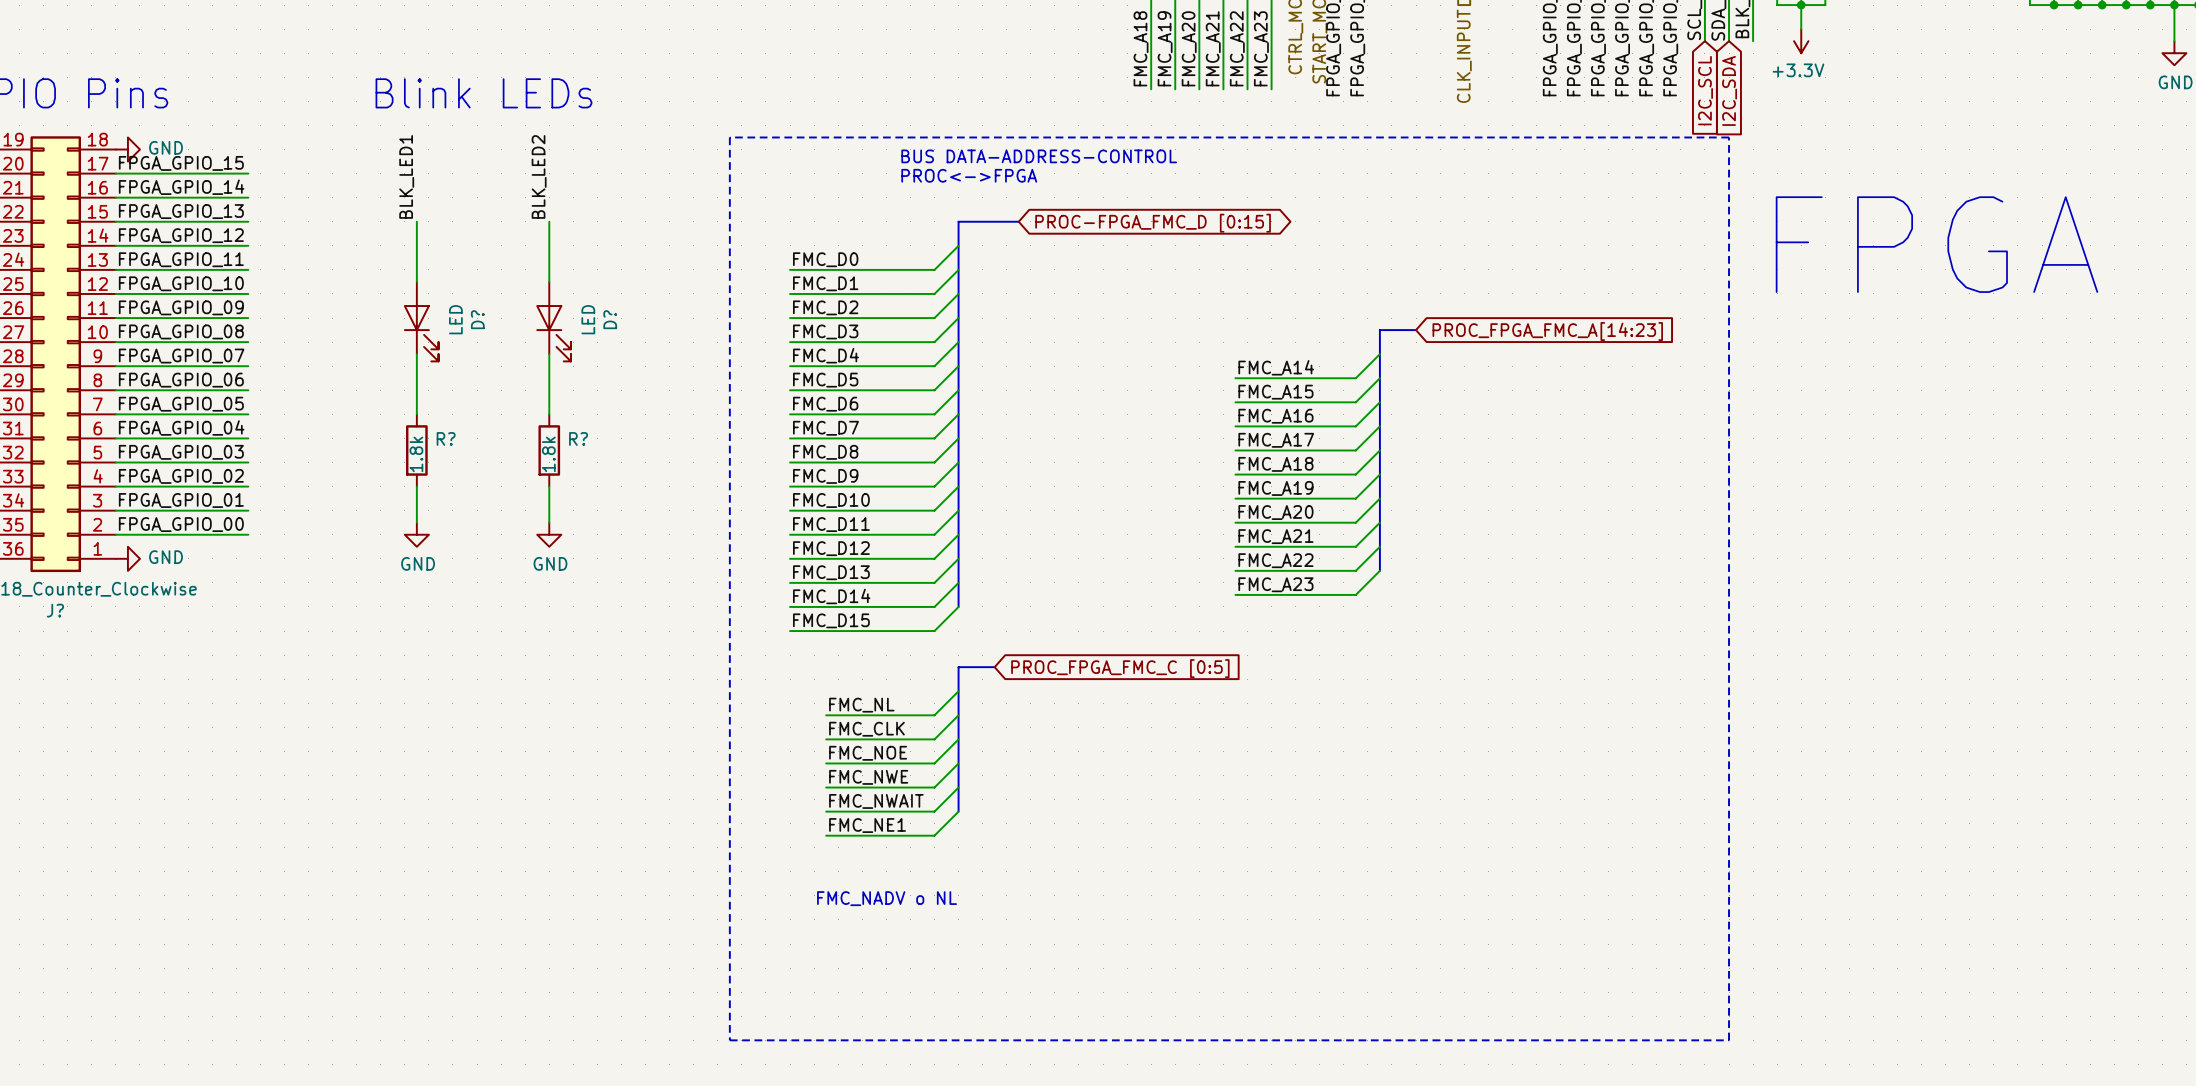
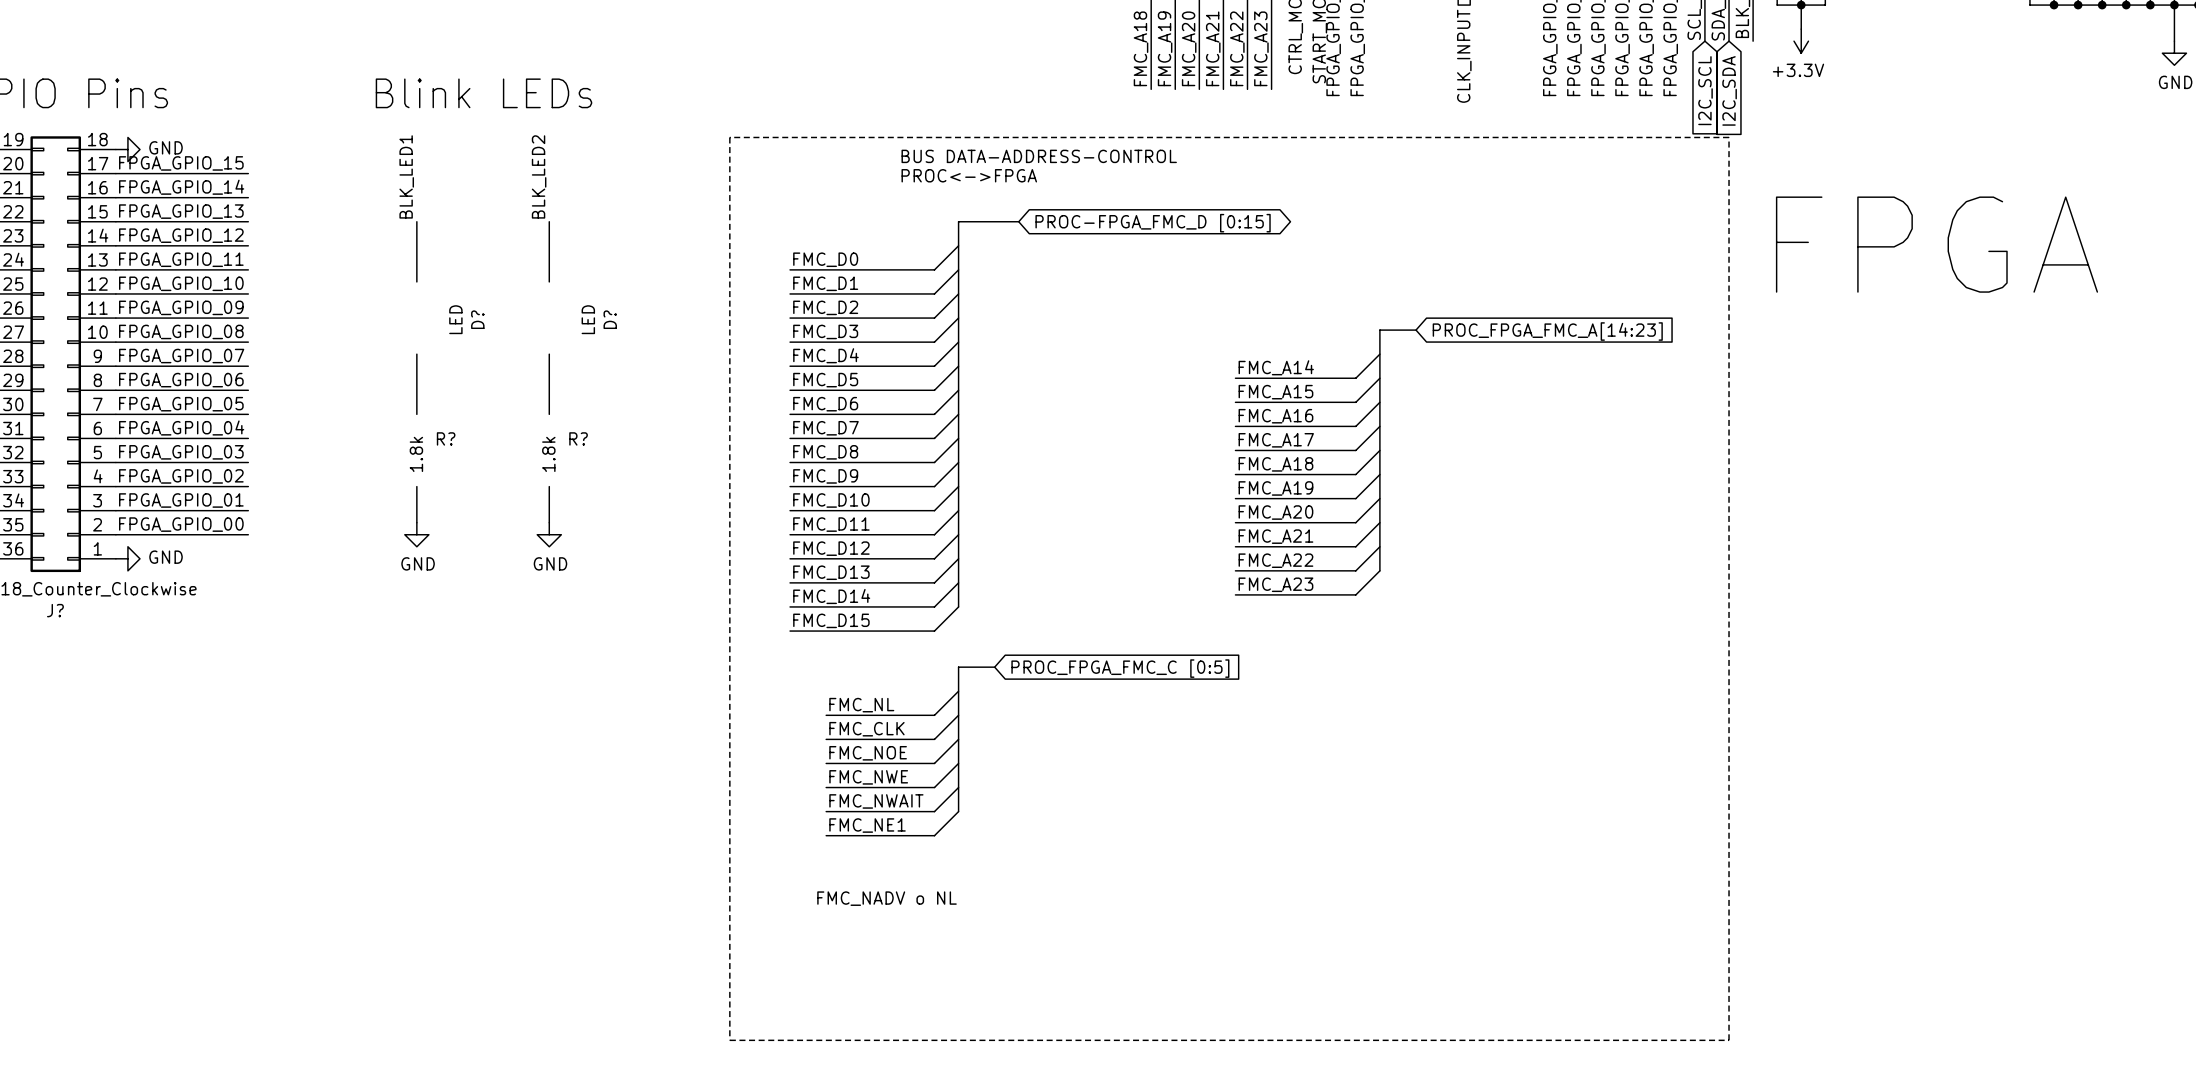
D?: LED (421, 321) -> none
D?: LED (553, 321) -> none
R?: 1.8k (416, 450) -> none
R?: 1.8k (549, 450) -> none
R?: none -> 1.8k (432, 452)
R?: none -> 1.8k (564, 452)

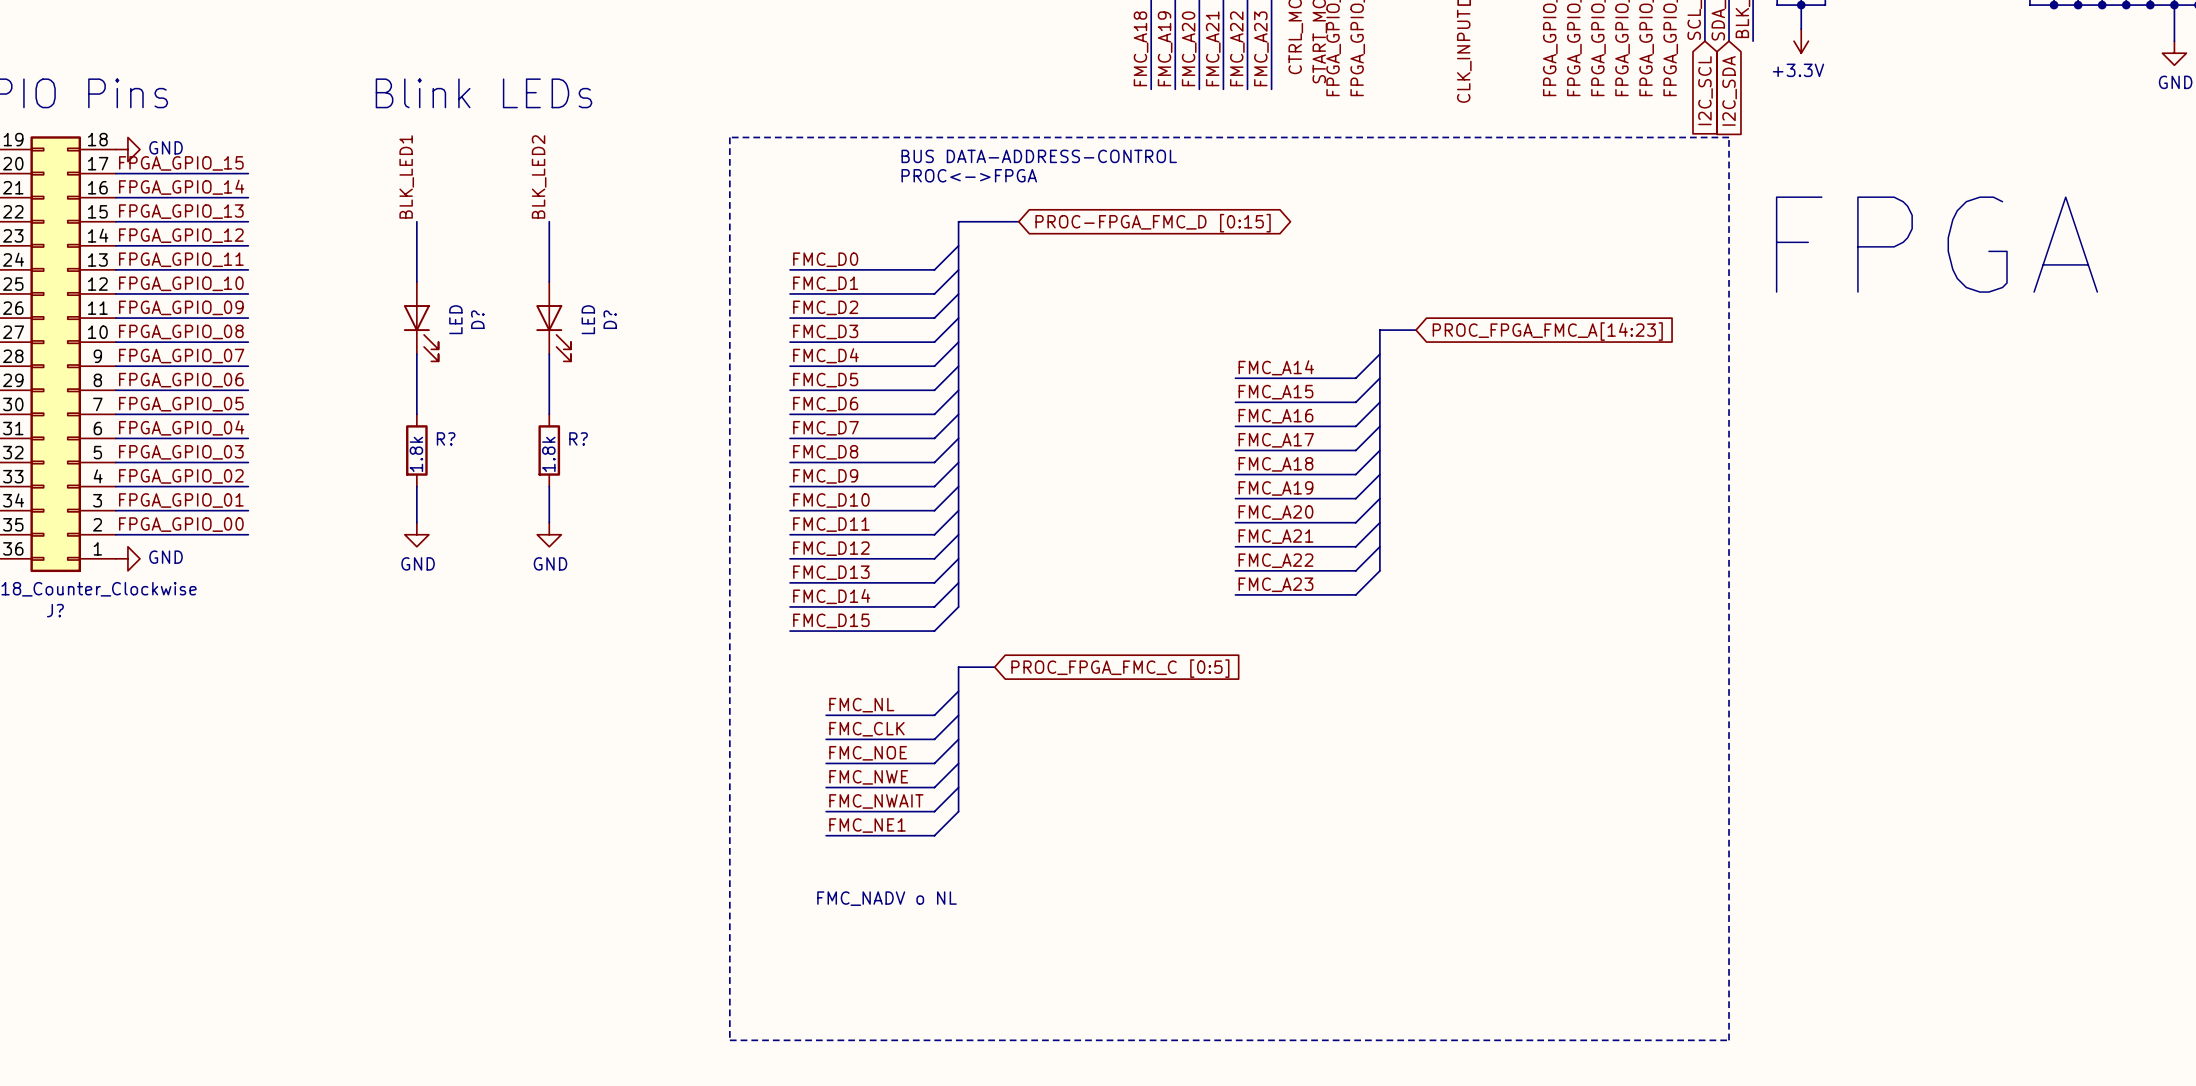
D?: none -> LED (421, 321)
D?: none -> LED (553, 321)
R?: none -> 1.8k (416, 450)
R?: none -> 1.8k (549, 450)
R?: 1.8k (432, 452) -> none
R?: 1.8k (564, 452) -> none

